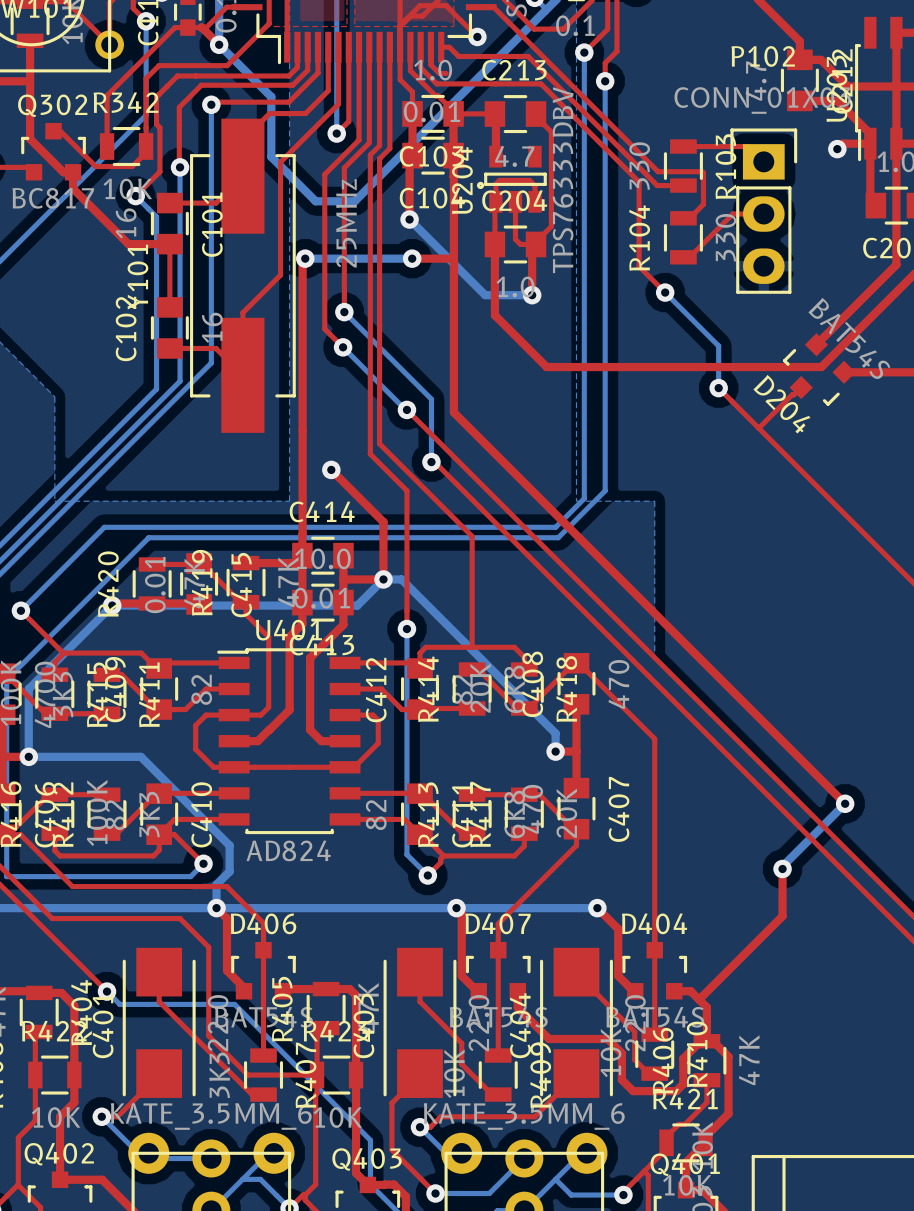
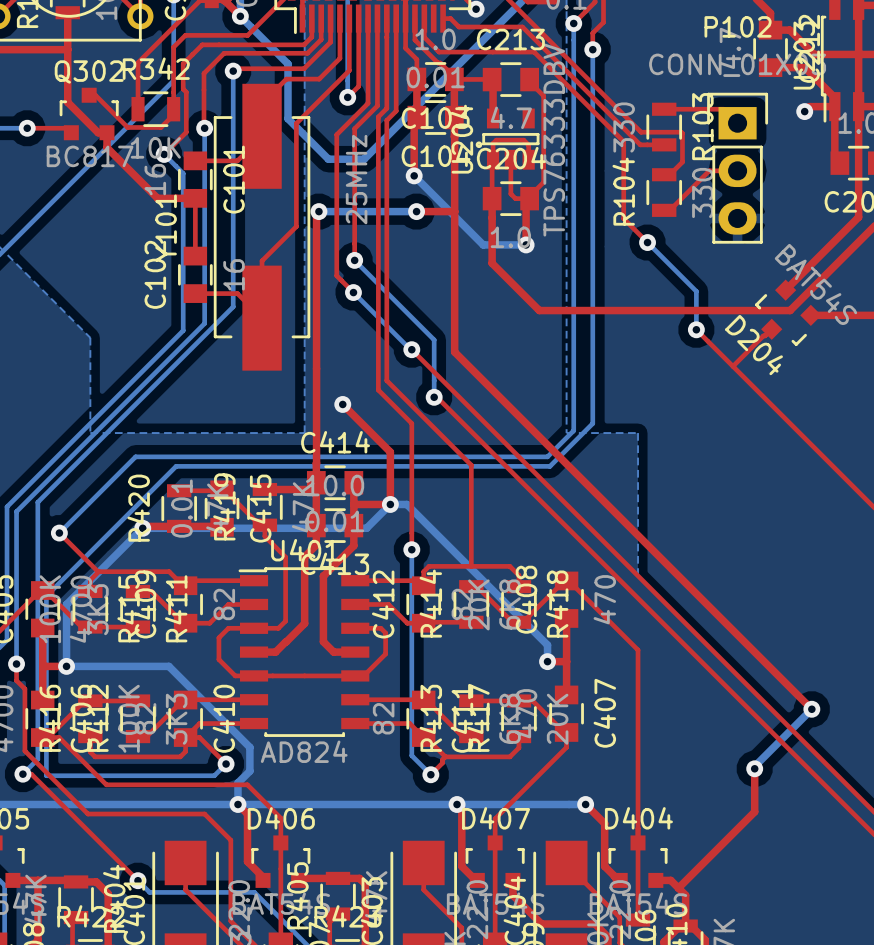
top track: (430, 47) (430, 64) (439, 73) (446, 73) -> none

